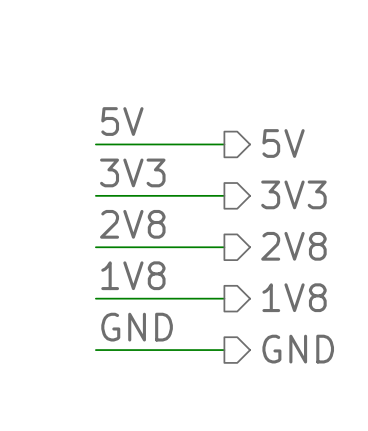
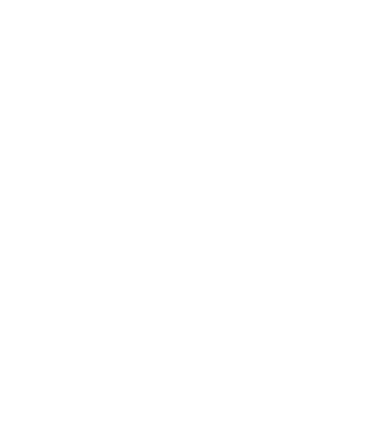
label: 5V (122, 121) -> none
hierarchical label: 5V (283, 143) -> none
wire: (95, 144) (224, 144) -> none
label: 3V3 (132, 172) -> none
hierarchical label: 3V3 (293, 194) -> none
wire: (95, 195) (224, 195) -> none
label: 2V8 (132, 224) -> none
hierarchical label: 2V8 (293, 246) -> none
wire: (95, 247) (224, 247) -> none
label: 1V8 (133, 275) -> none
hierarchical label: 1V8 (294, 297) -> none
wire: (95, 298) (224, 298) -> none
label: GND (137, 327) -> none
hierarchical label: GND (298, 349) -> none
wire: (95, 350) (224, 350) -> none

